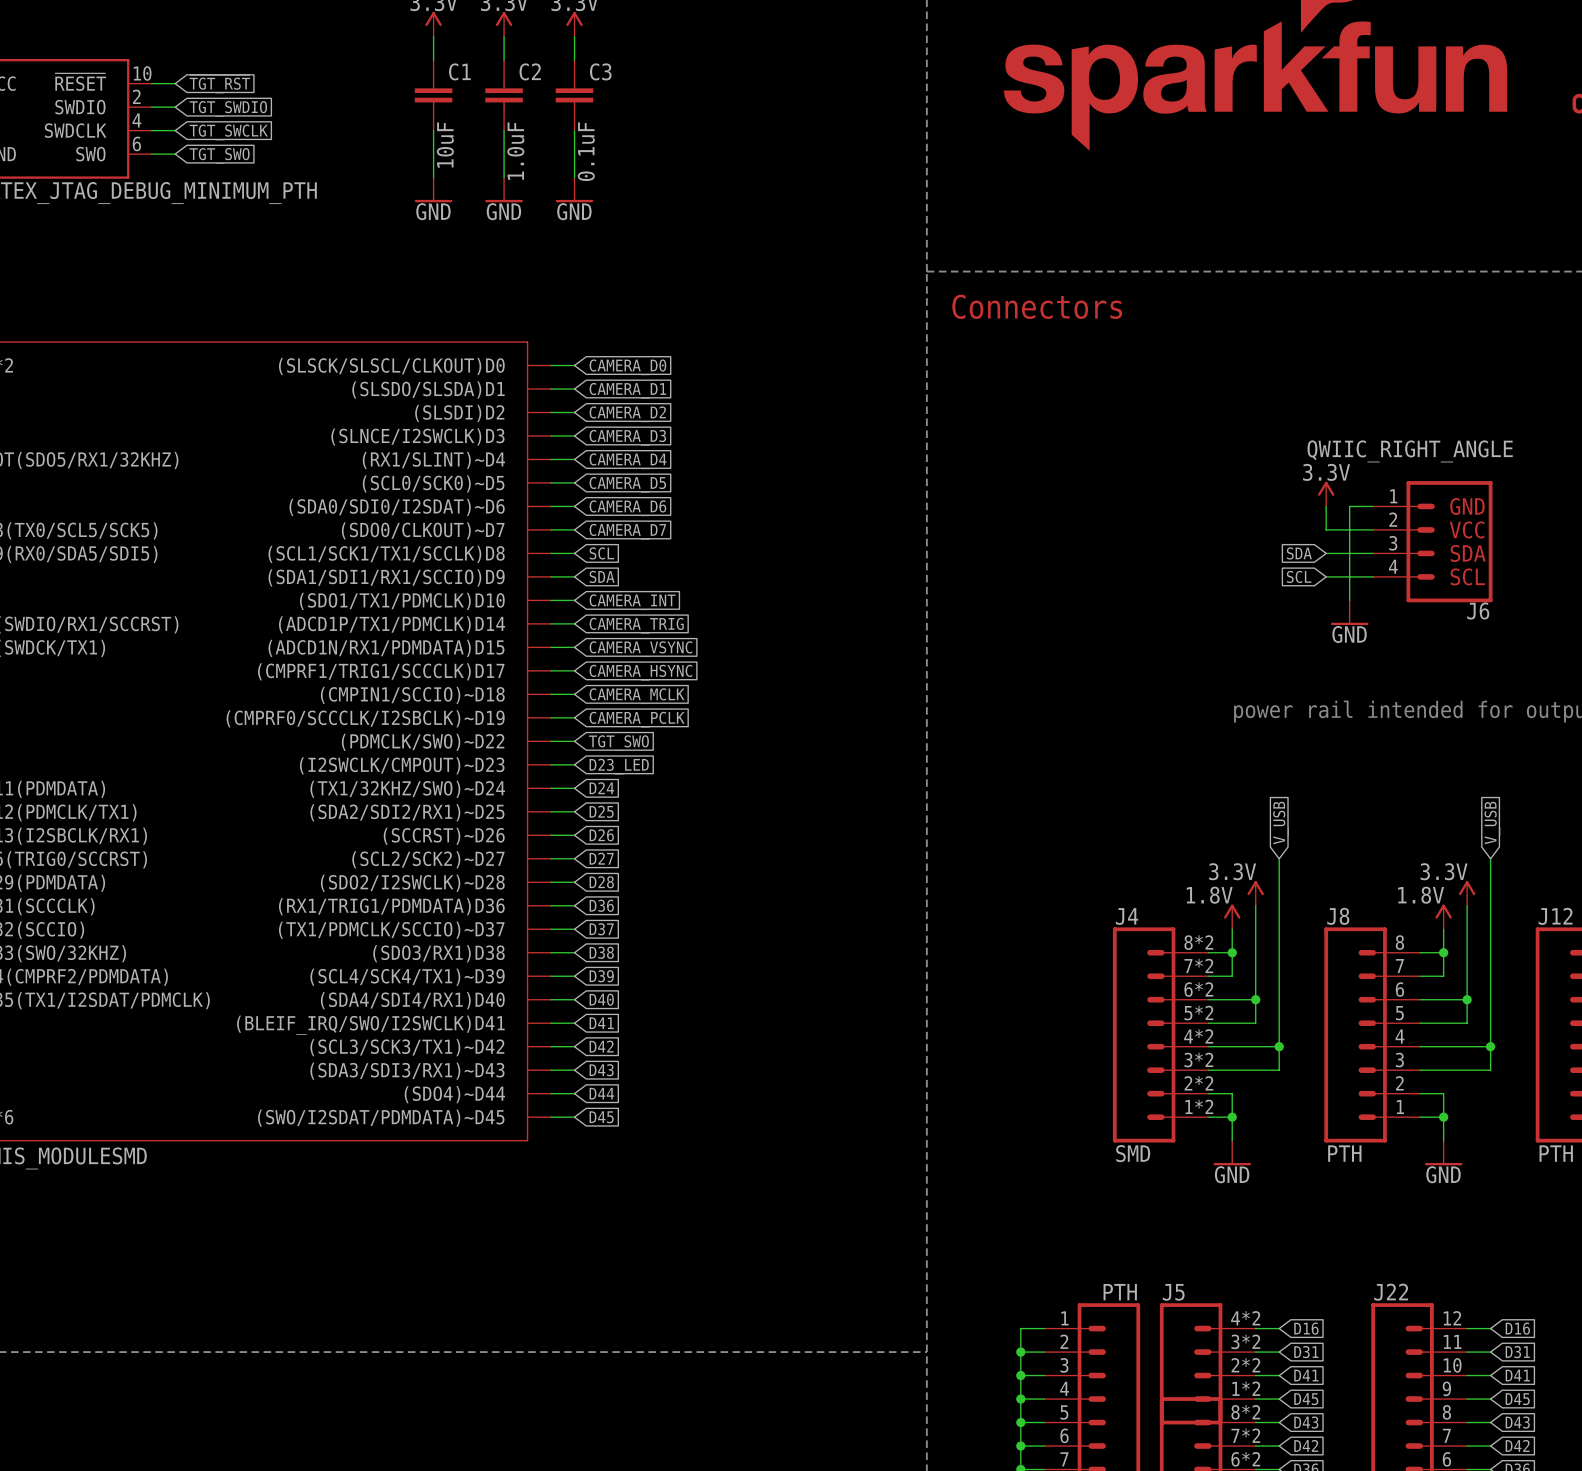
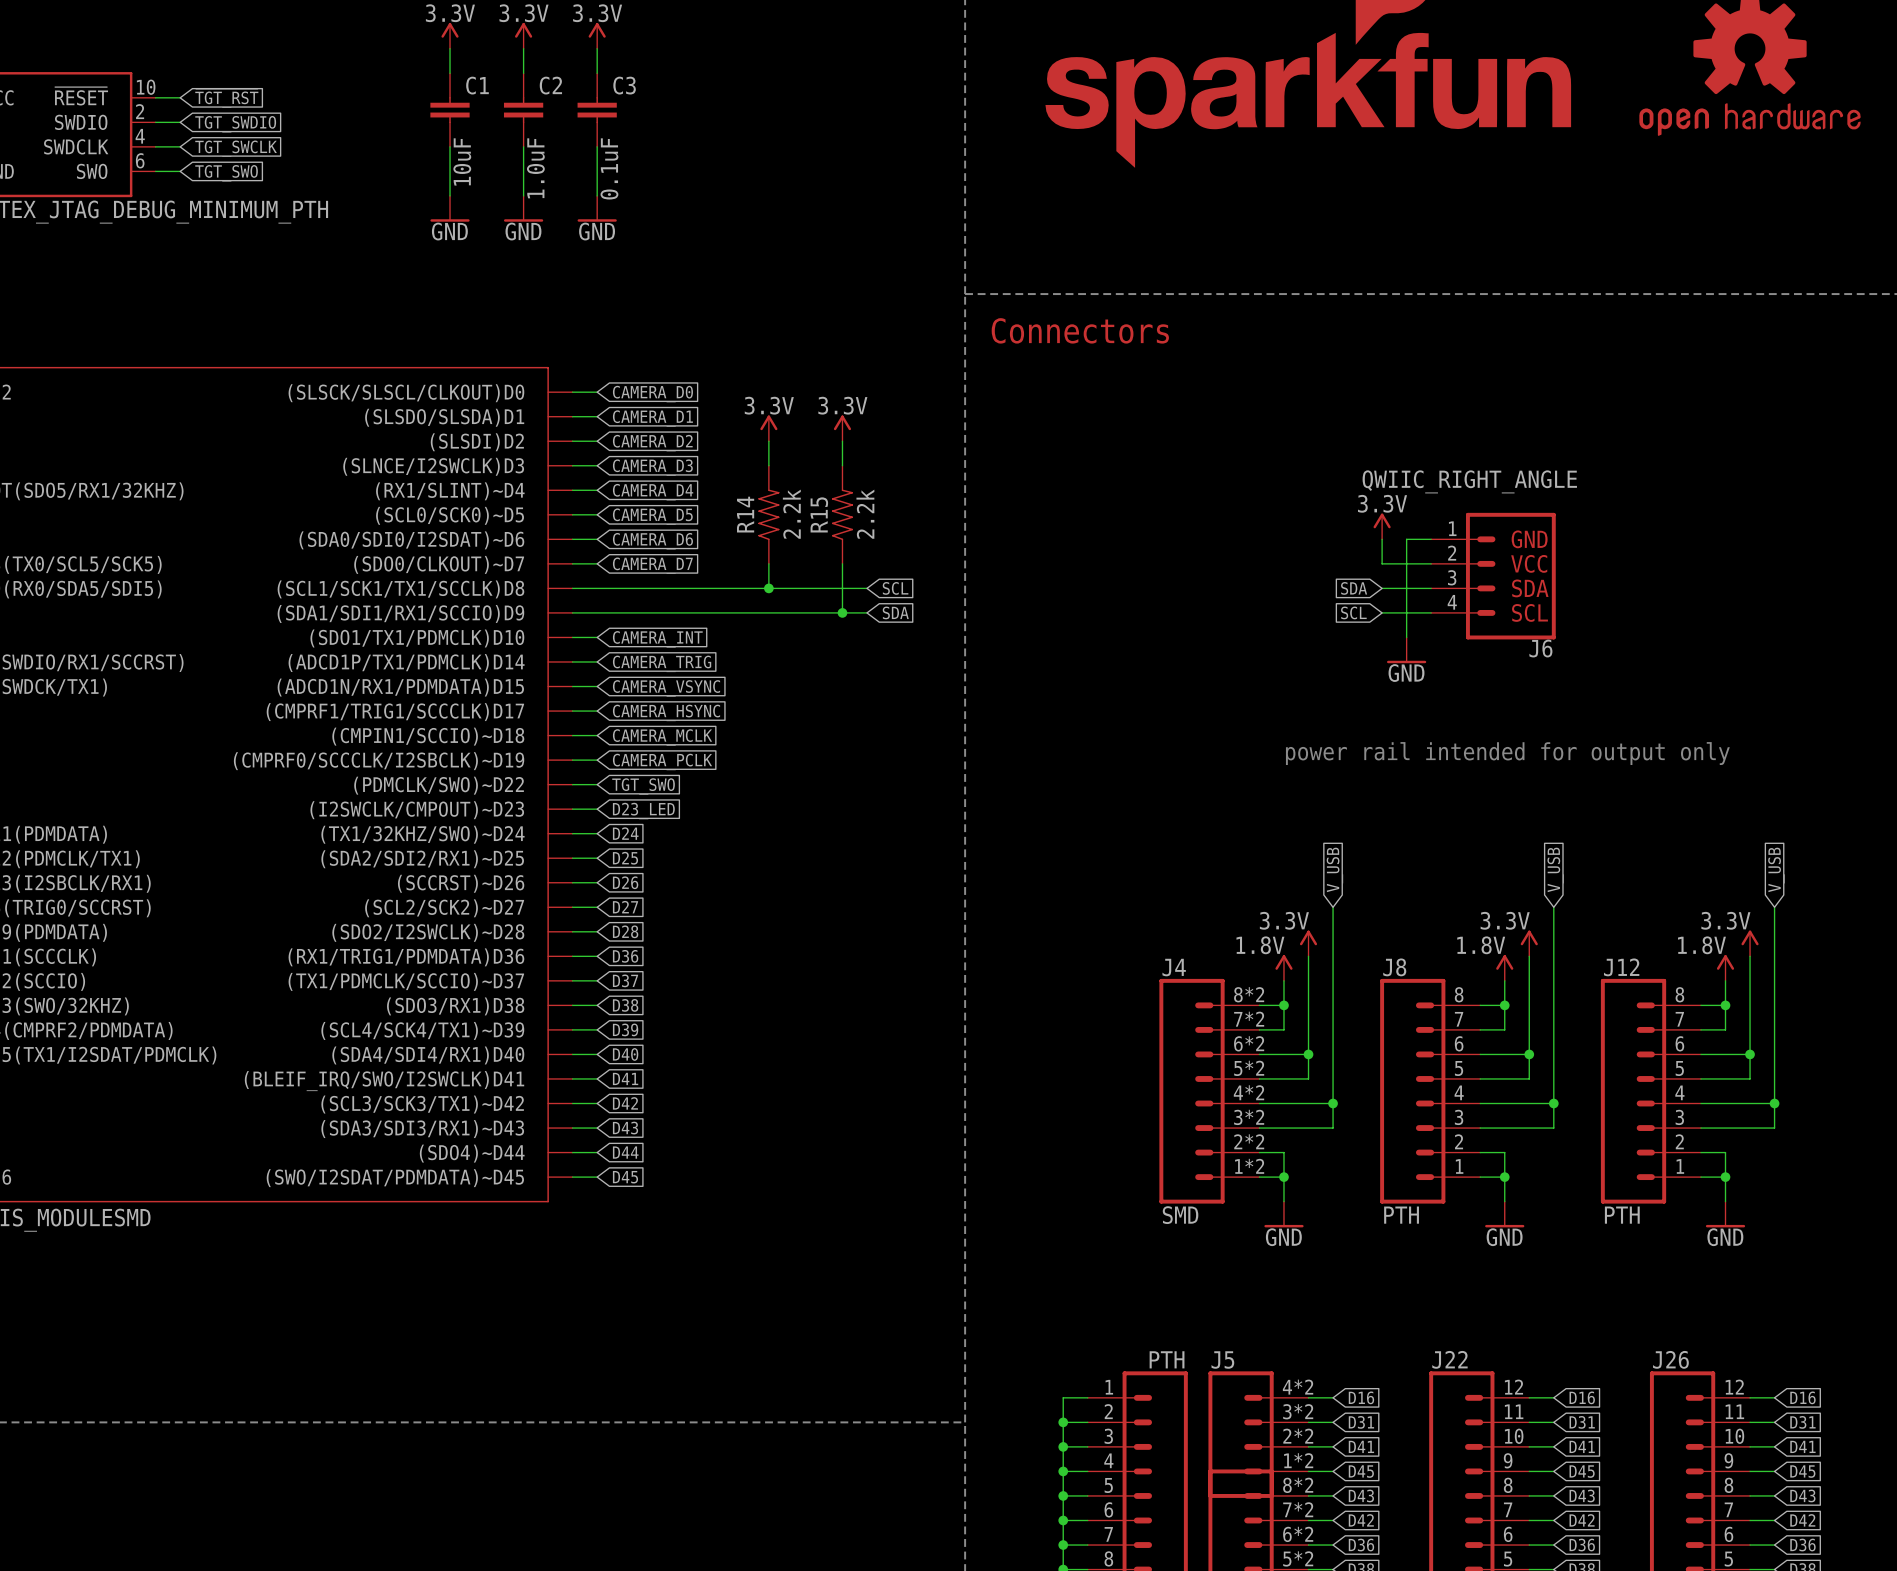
power symbol: none -> 3.3V (768, 428)
power symbol: none -> 3.3V (842, 428)
wire: none -> (768, 441) (768, 465)
wire: none -> (842, 441) (842, 465)
R14: none -> 2.2k (768, 514)
R15: none -> 2.2k (842, 514)
wire: none -> (768, 563) (768, 588)
wire: none -> (842, 563) (842, 612)
wire: none -> (597, 588) (867, 588)
global label: SCL (601, 553) -> none
junction: none -> (768, 588)
global label: none -> SCL (895, 588)
wire: none -> (597, 612) (867, 612)
global label: SDA (602, 576) -> none
junction: none -> (842, 612)
global label: none -> SDA (895, 612)

